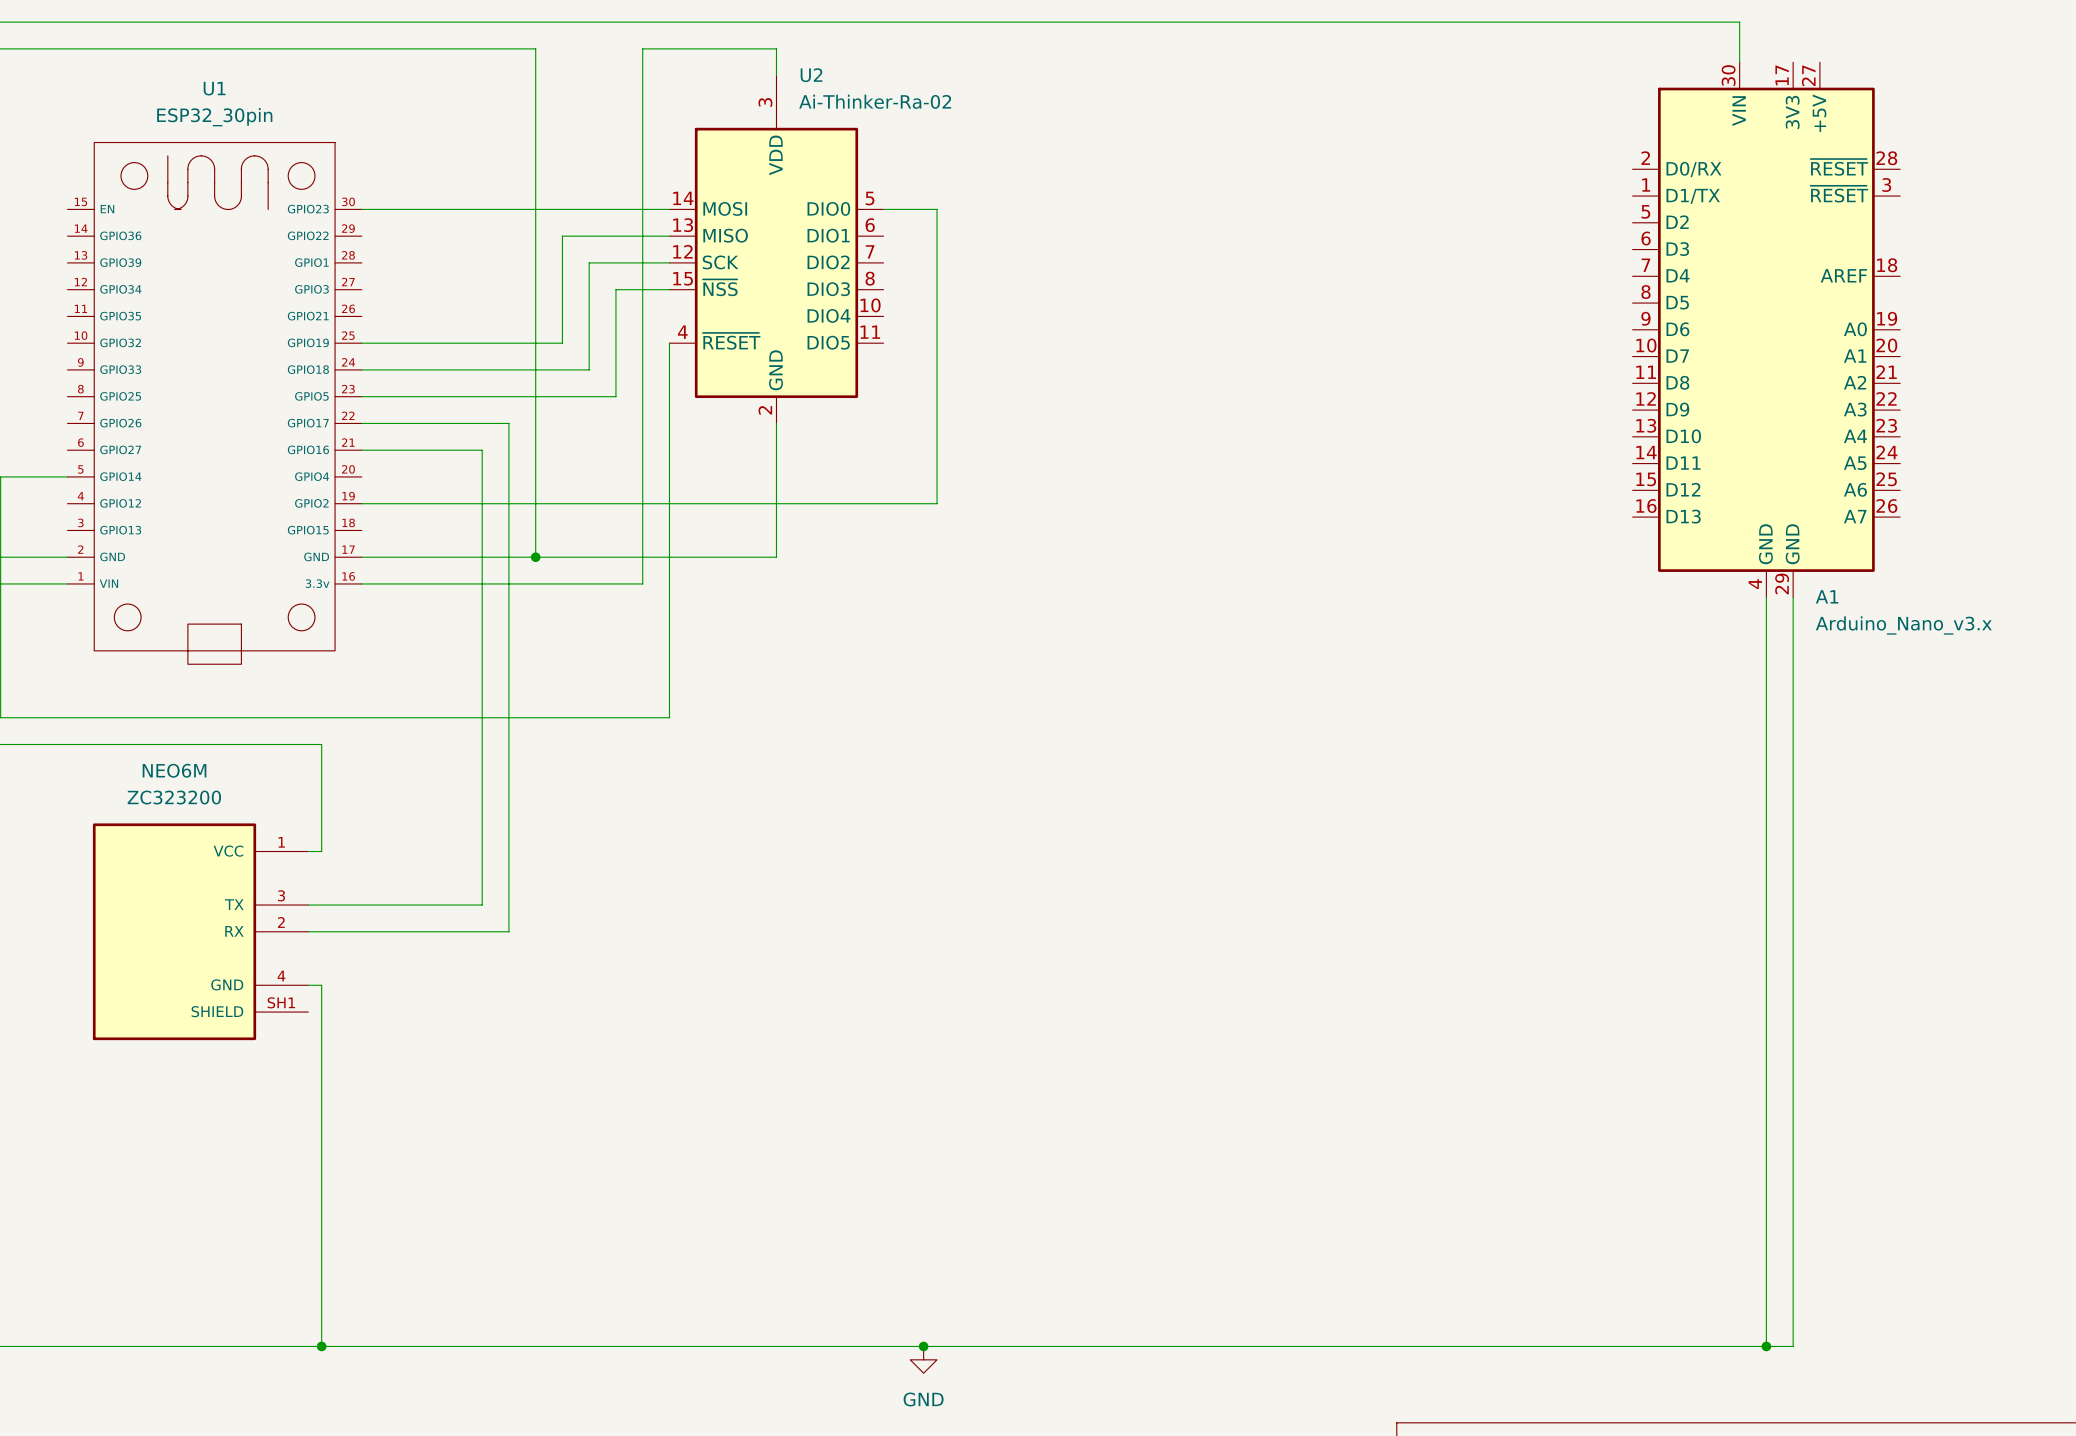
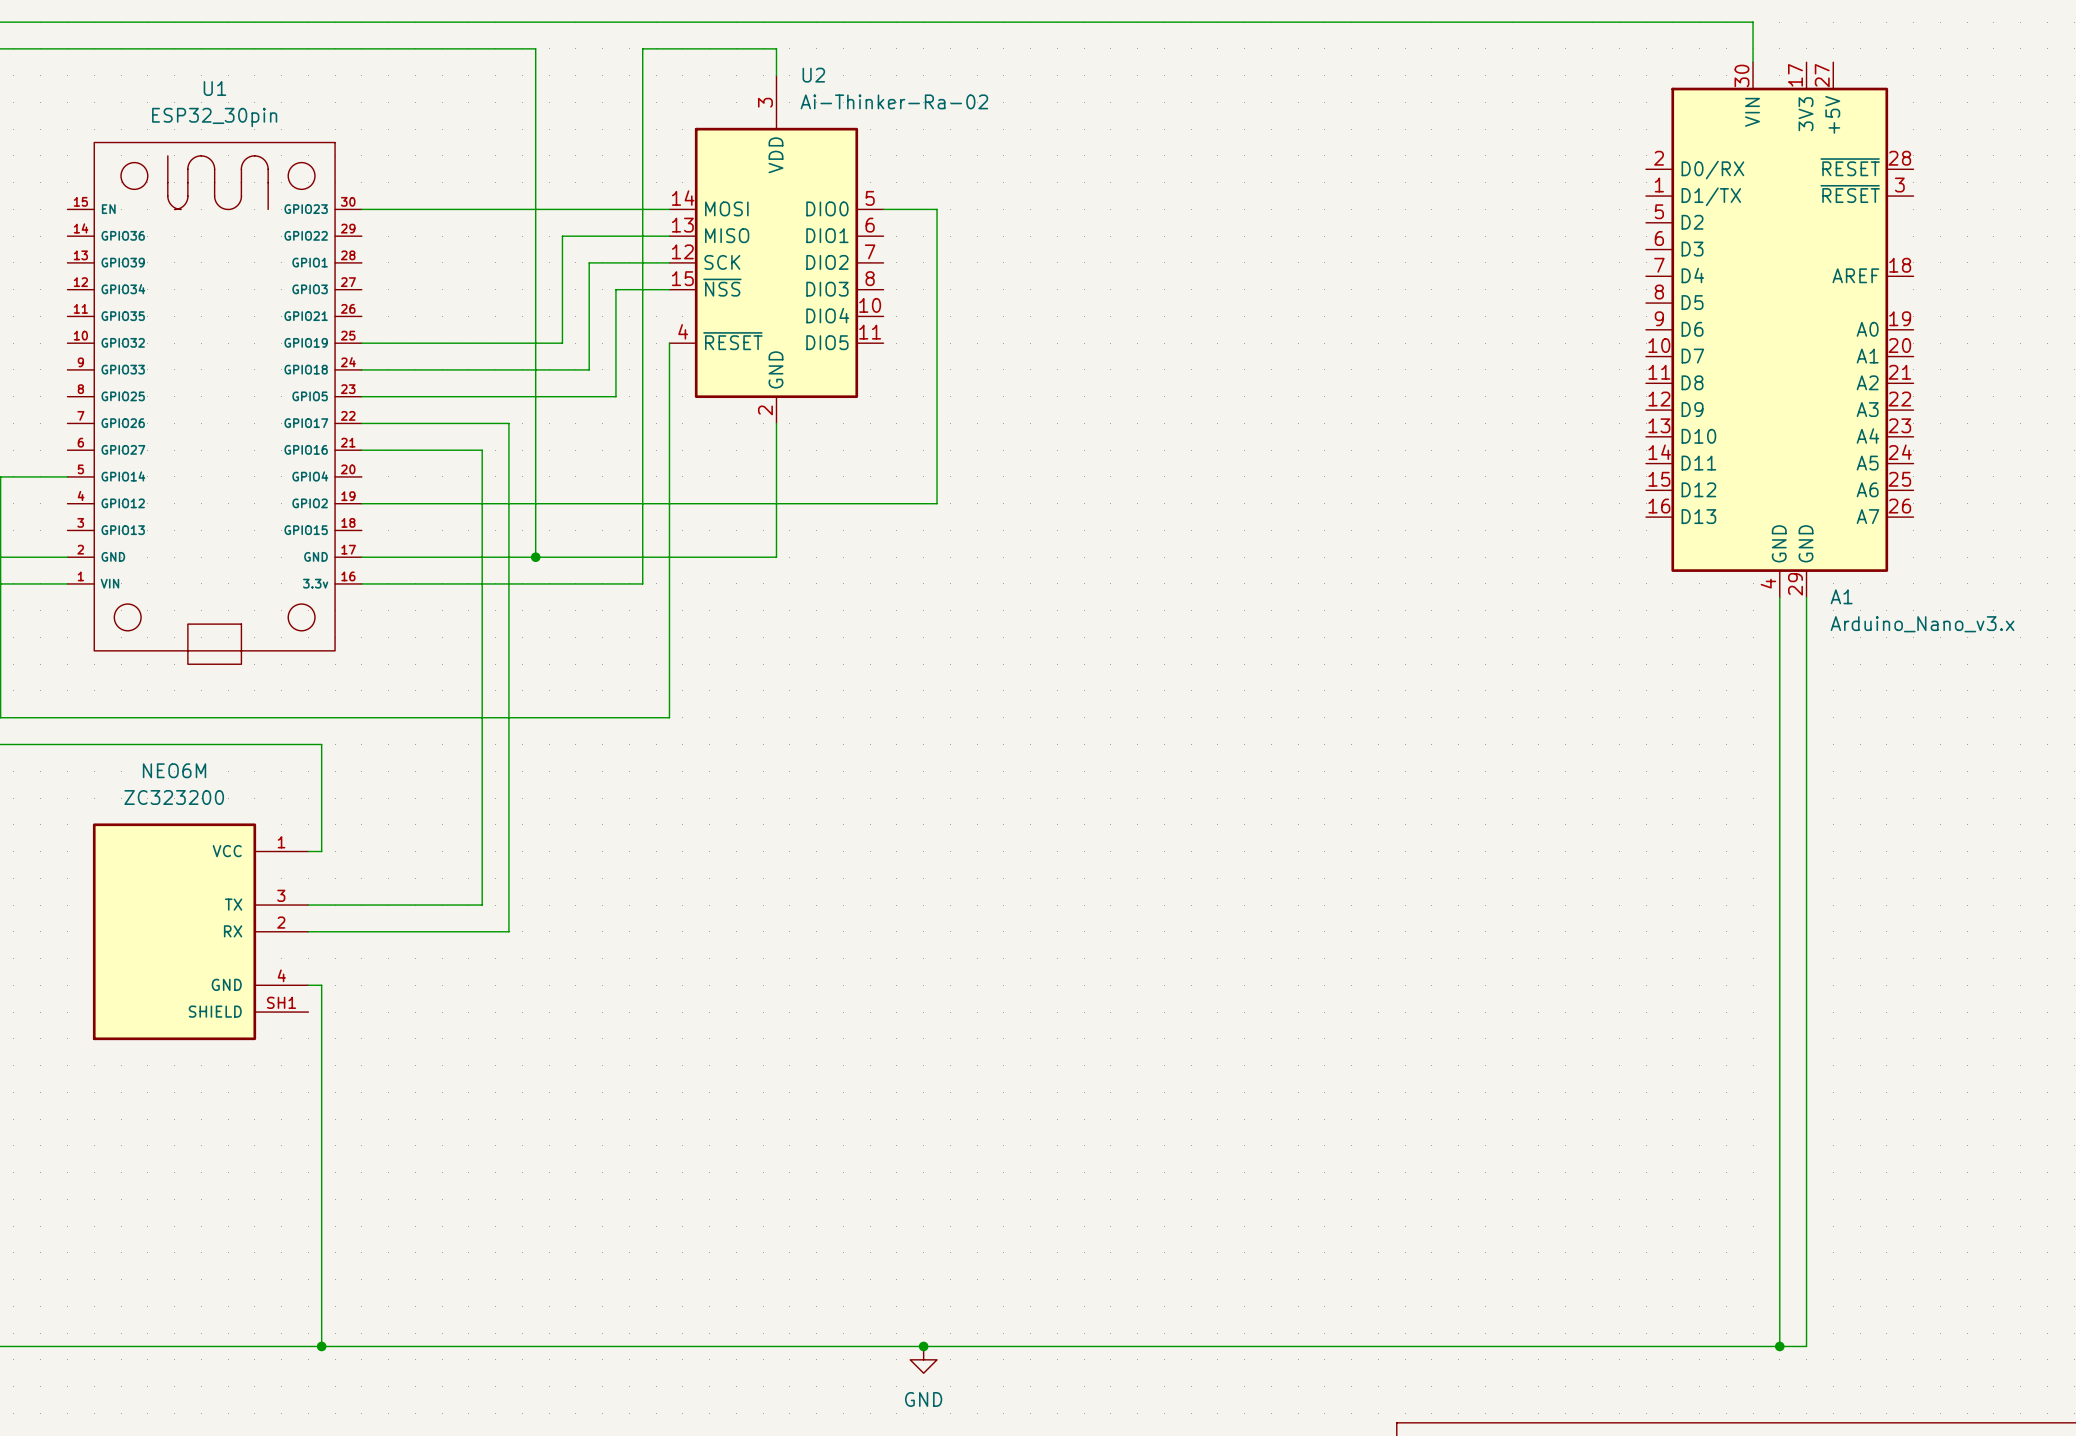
wire: (1739, 22) (1739, 62) -> (1739, 22) (1753, 22) (1753, 62)
A1 position: (1766, 329) -> (1779, 329)
wire: (1766, 597) (1766, 1346) -> (1779, 597) (1779, 1346)
wire: (1793, 597) (1793, 1346) -> (1806, 597) (1806, 1346) (1793, 1346)
junction position: (1766, 1346) -> (1779, 1346)

